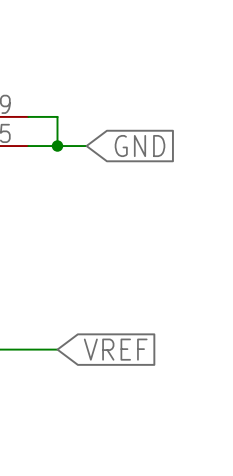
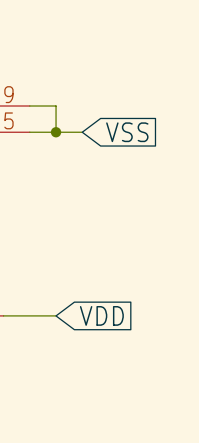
global label: GND (140, 146) -> VSS (127, 132)
global label: VREF (115, 349) -> VDD (101, 315)

